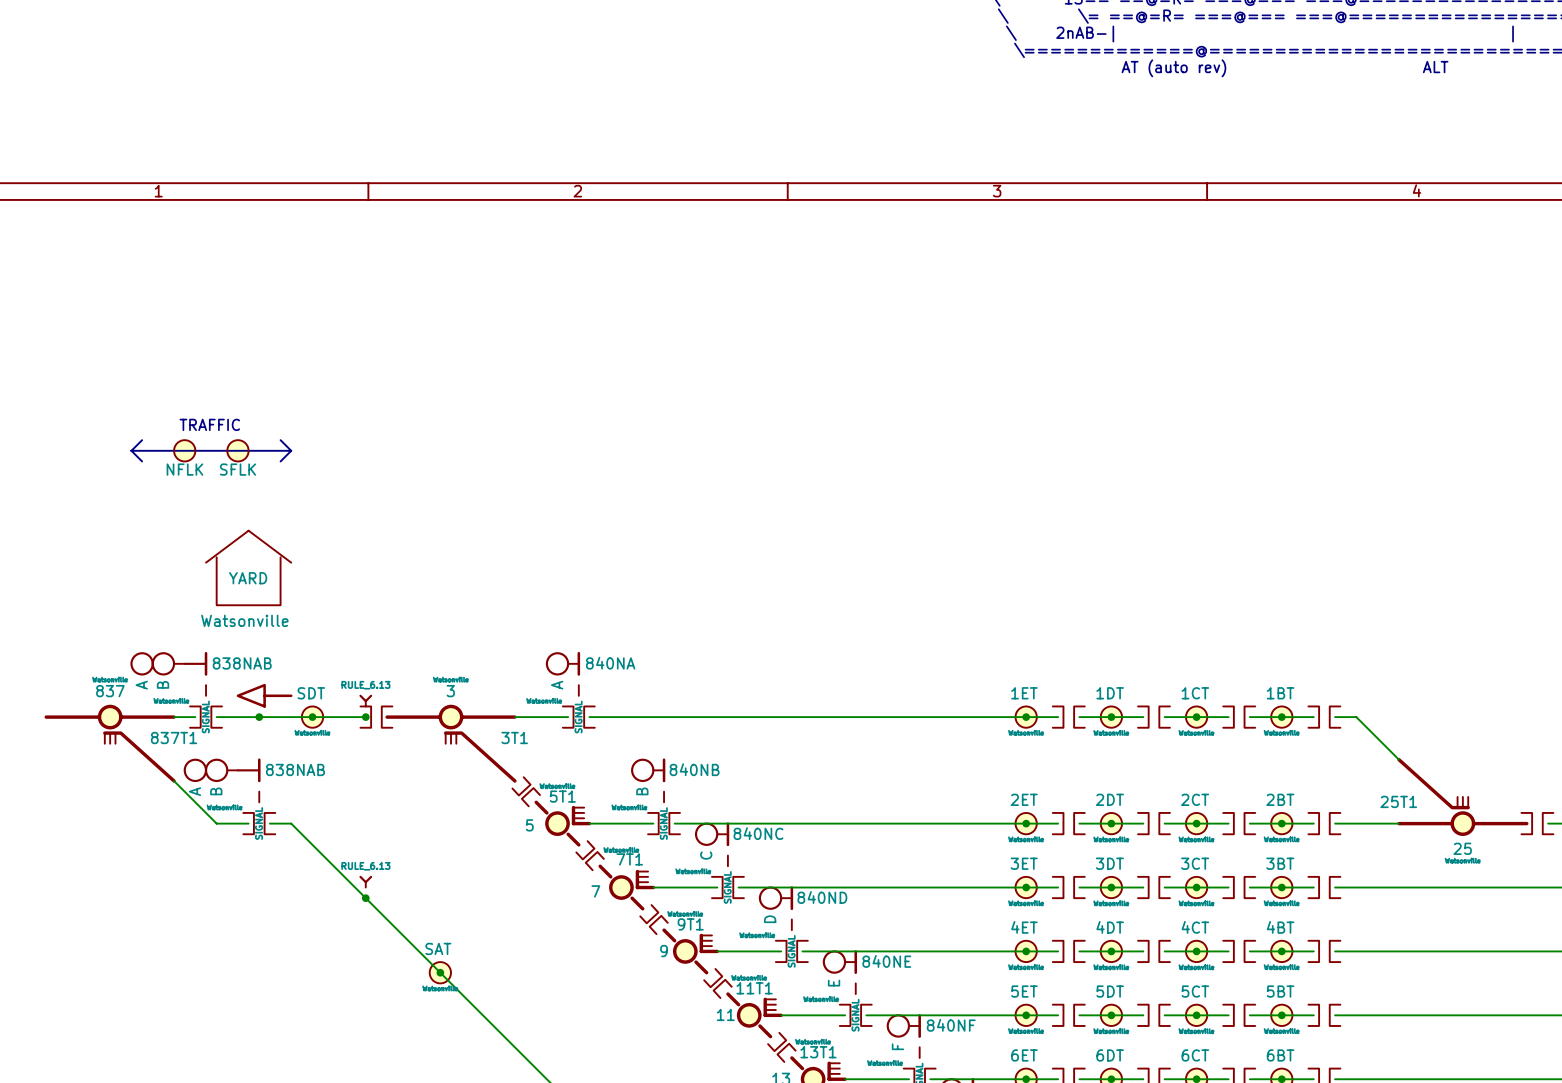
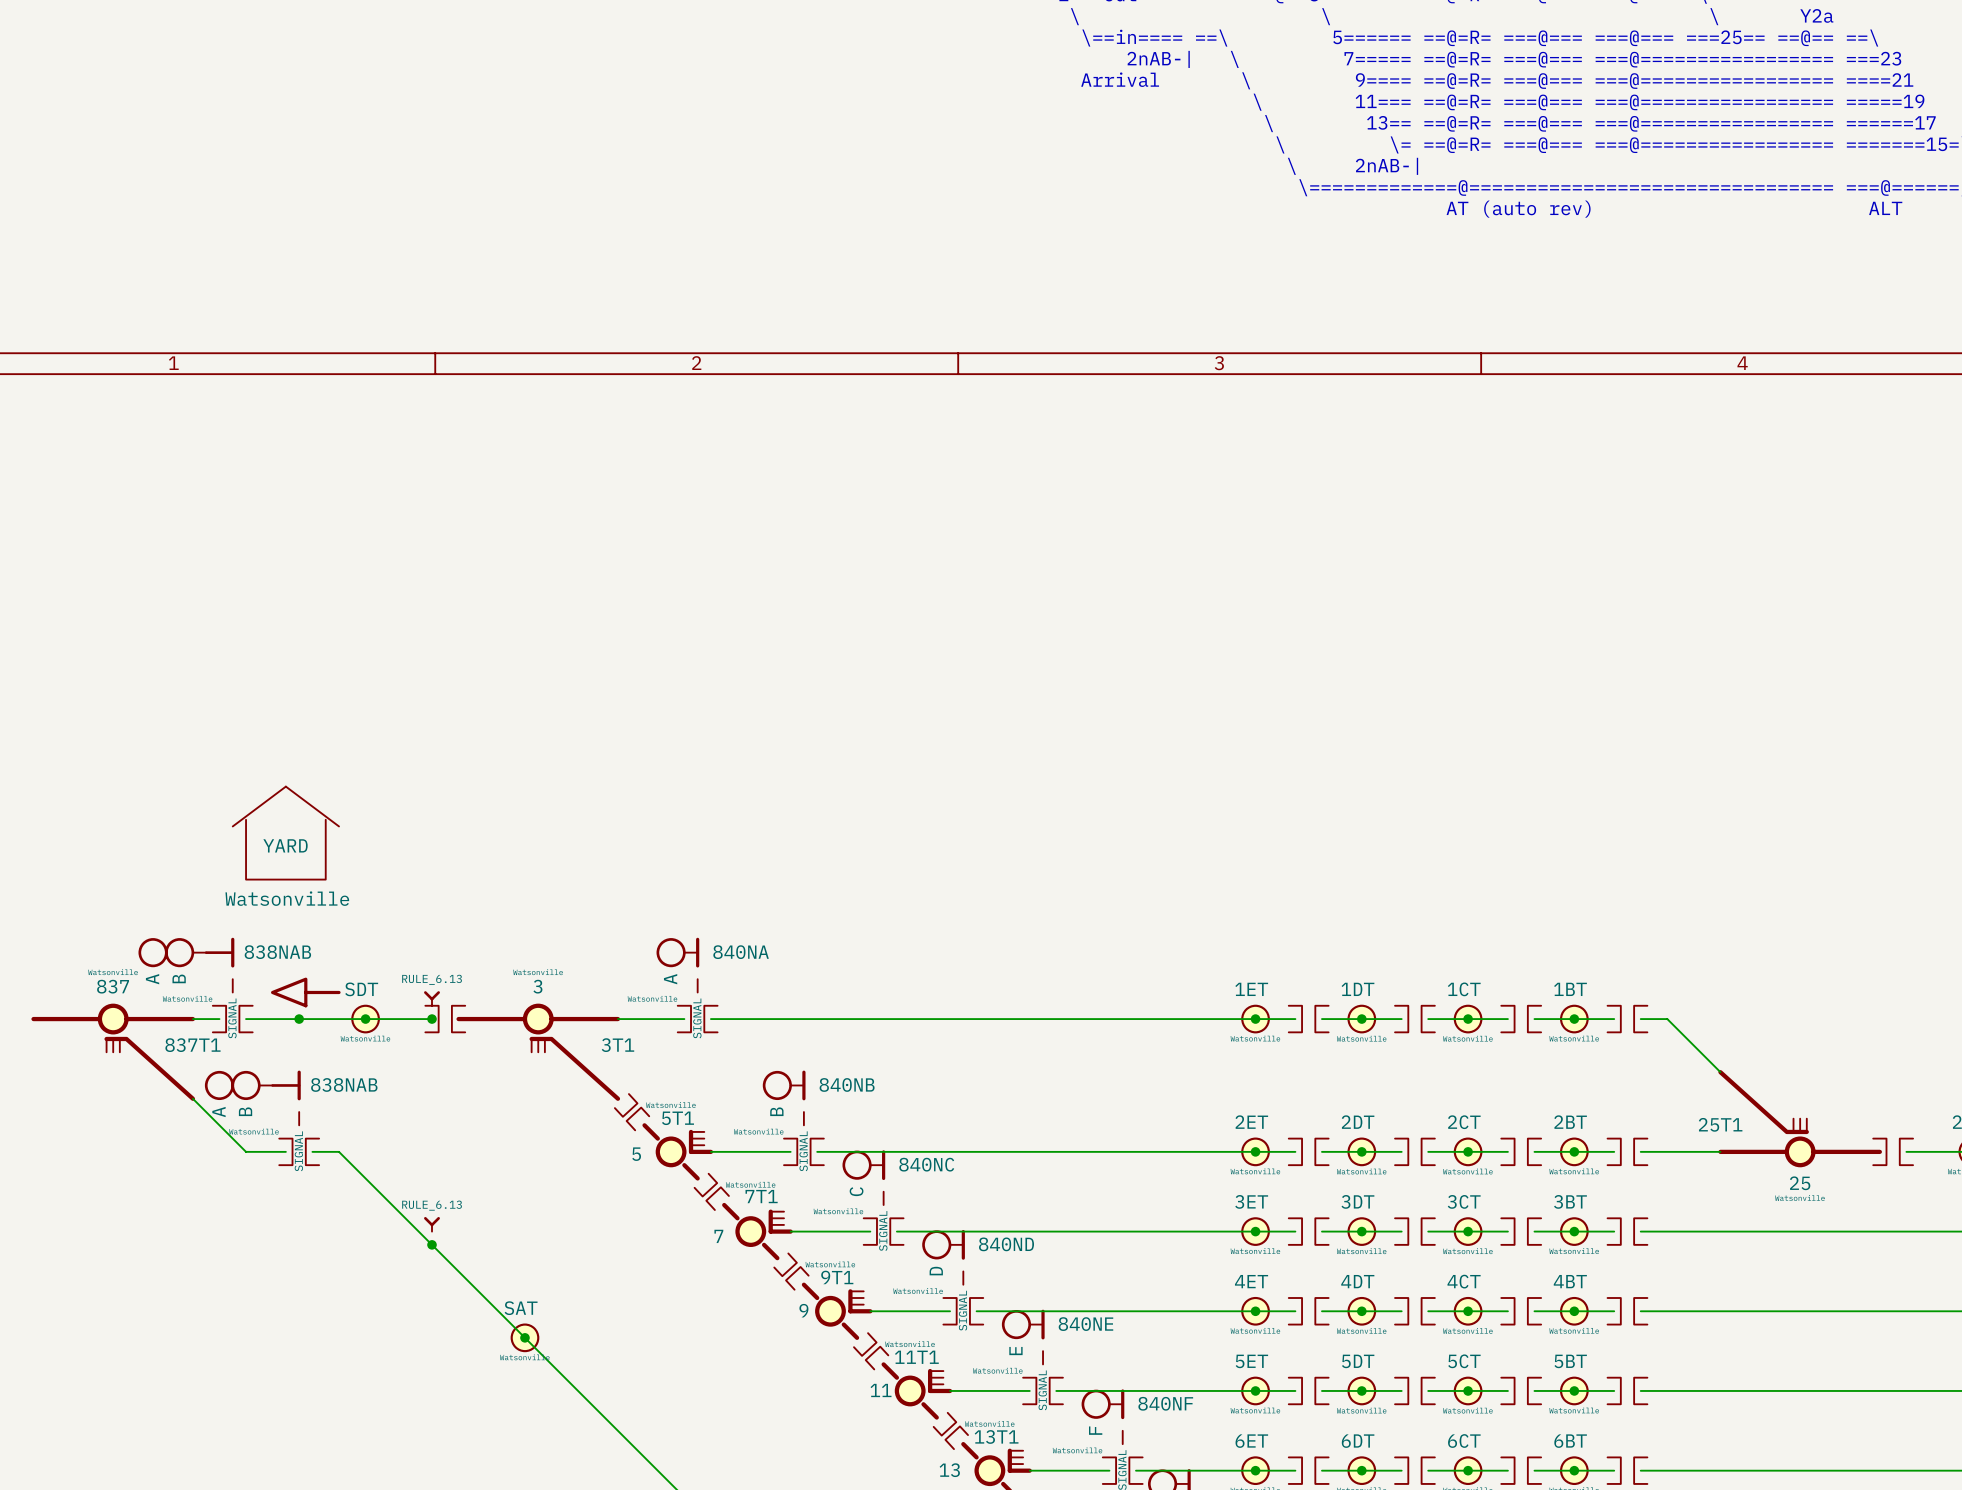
text: TRAFFIC (209, 424) -> none
line: (142, 440) (131, 450) -> none
line: (280, 440) (291, 450) -> none
line: (131, 450) (142, 461) -> none
line: (131, 450) (291, 450) -> none
part: NFLK (184, 450) -> none
part: SFLK (237, 450) -> none
line: (291, 450) (280, 461) -> none

